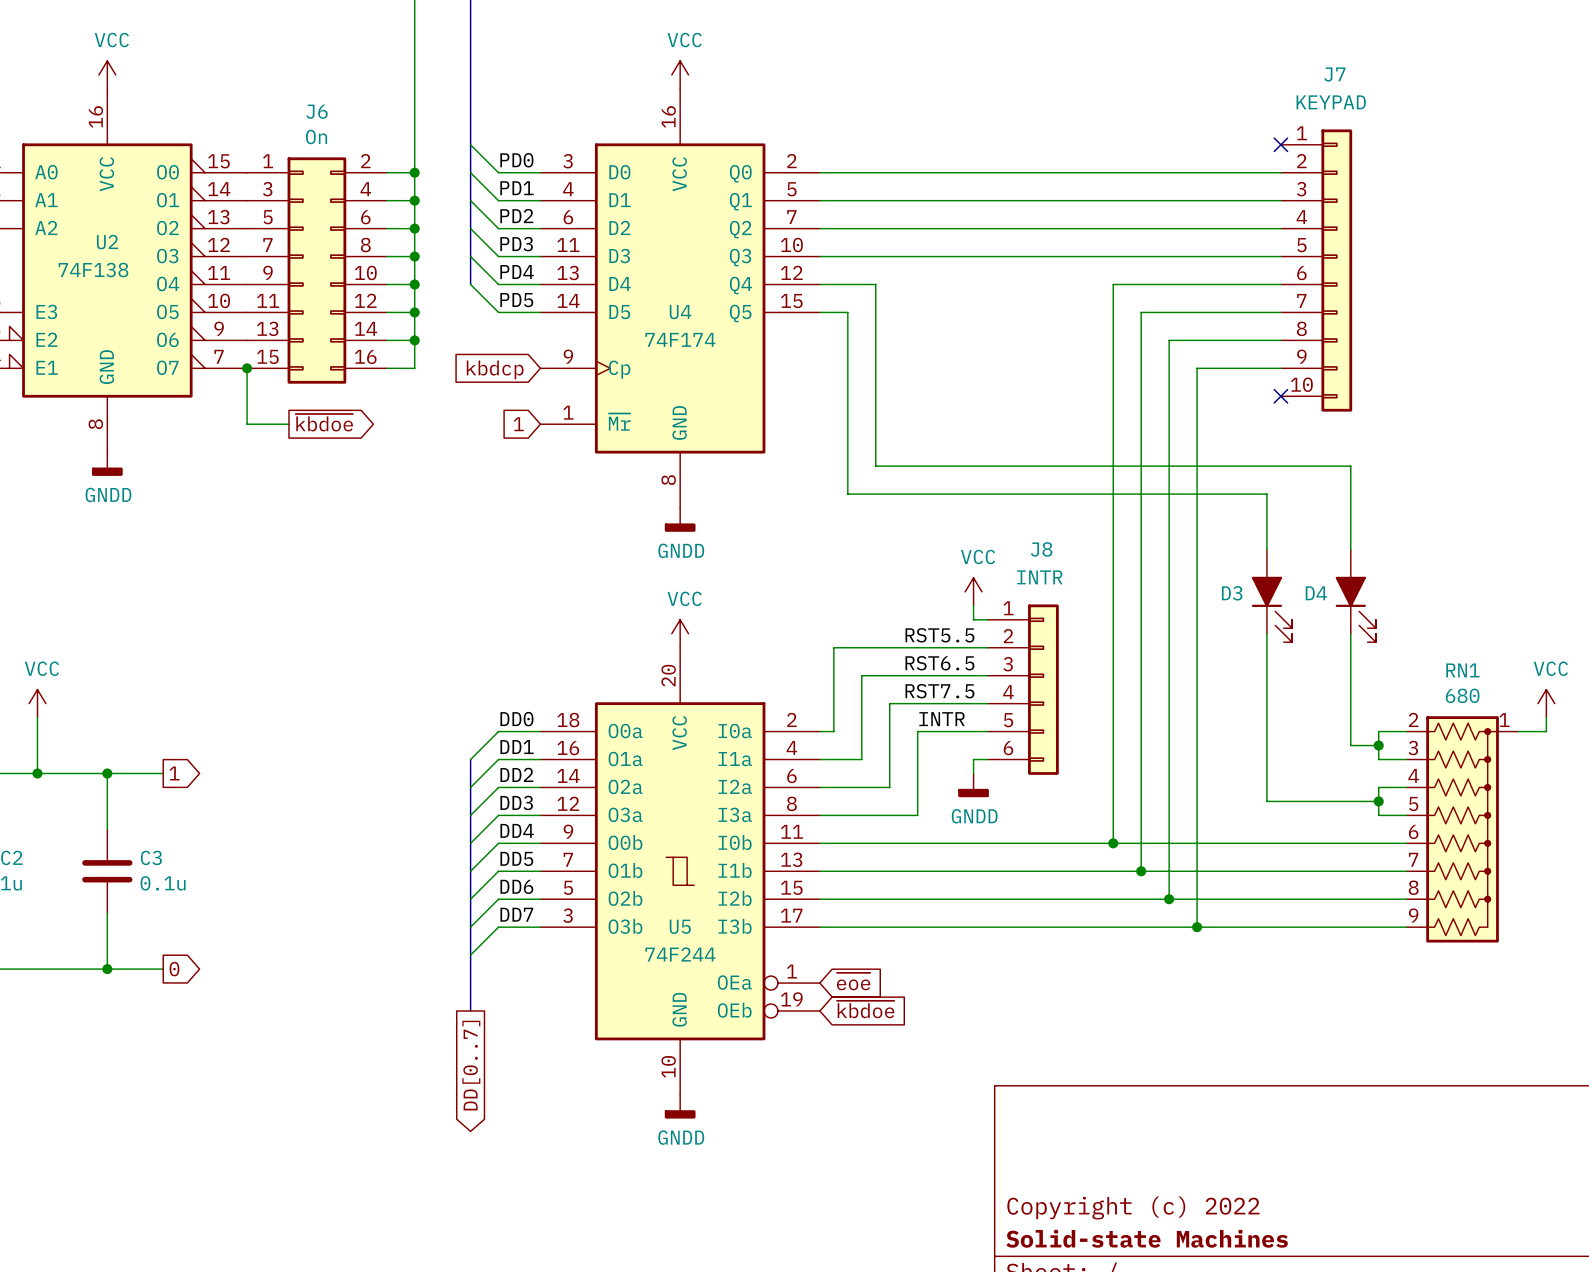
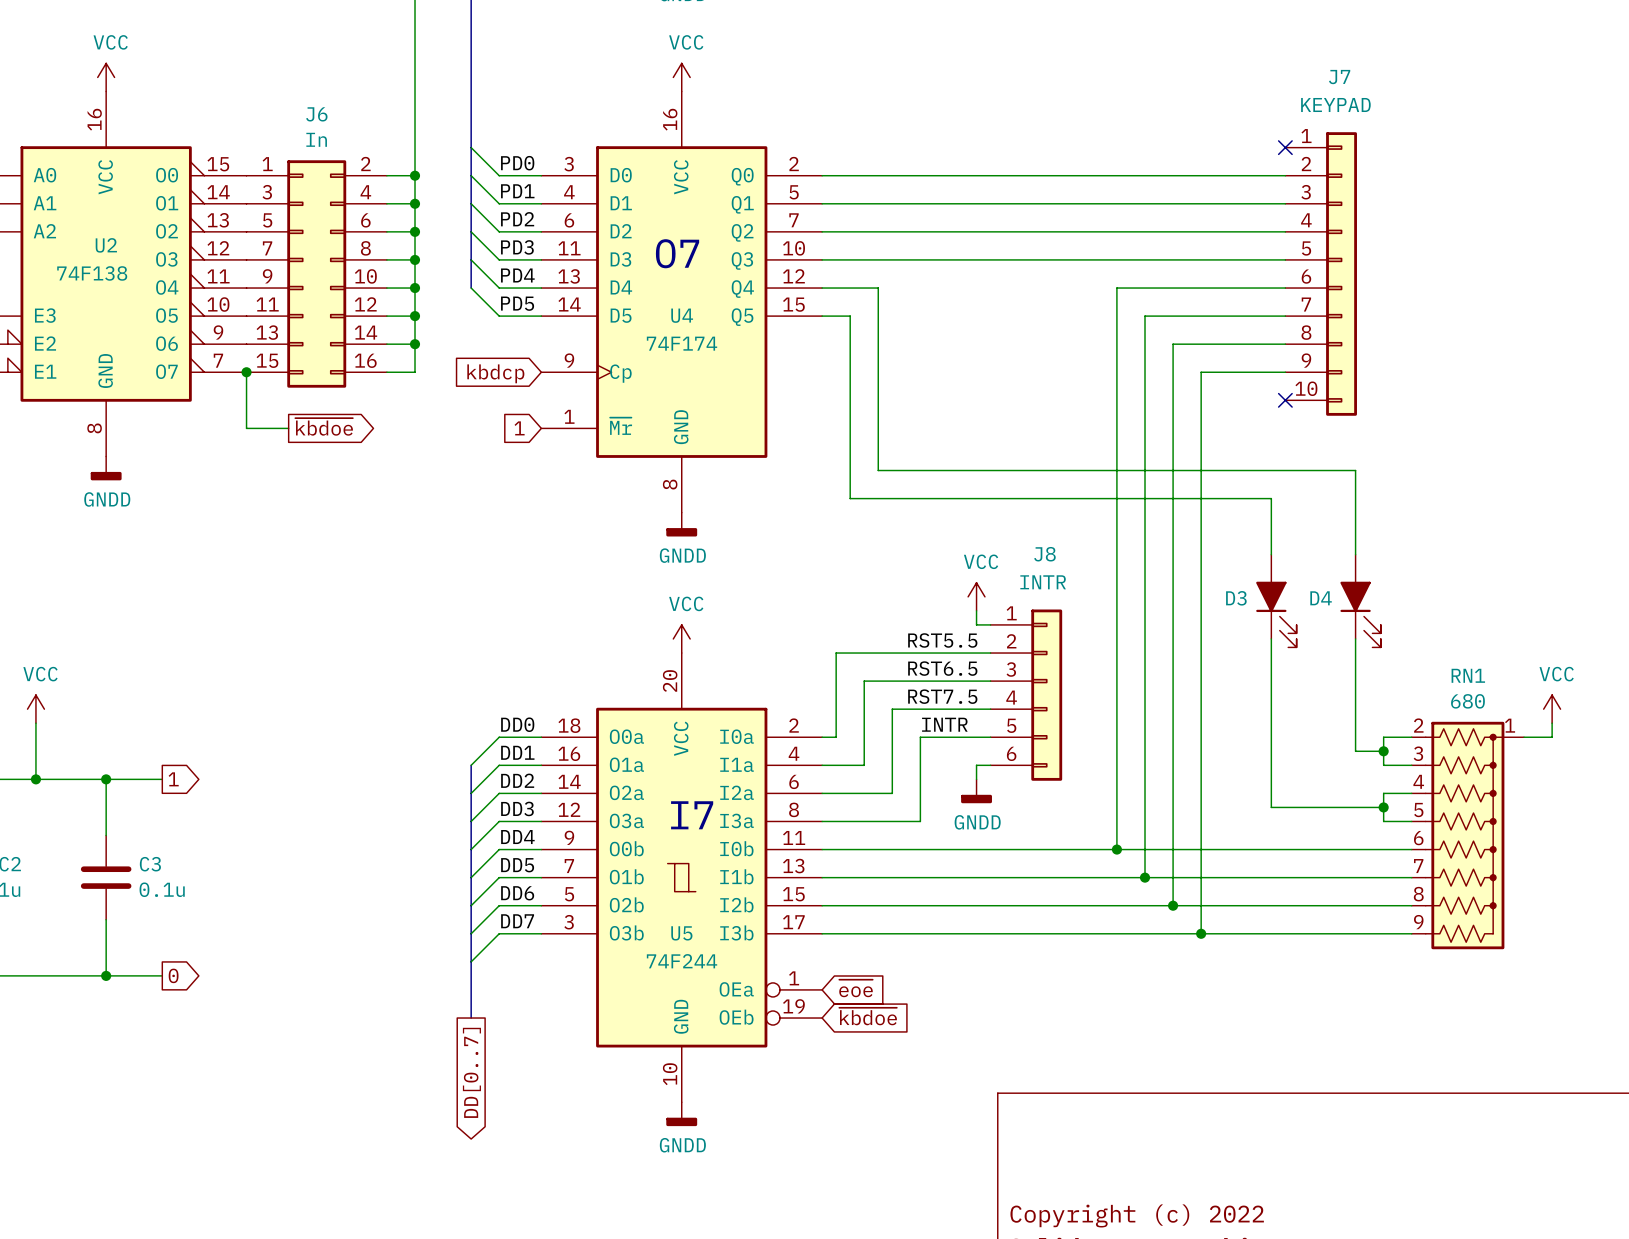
J6 value: On (316, 137) -> In (316, 139)
text: none -> O7 (677, 253)
text: none -> I7 (692, 815)

